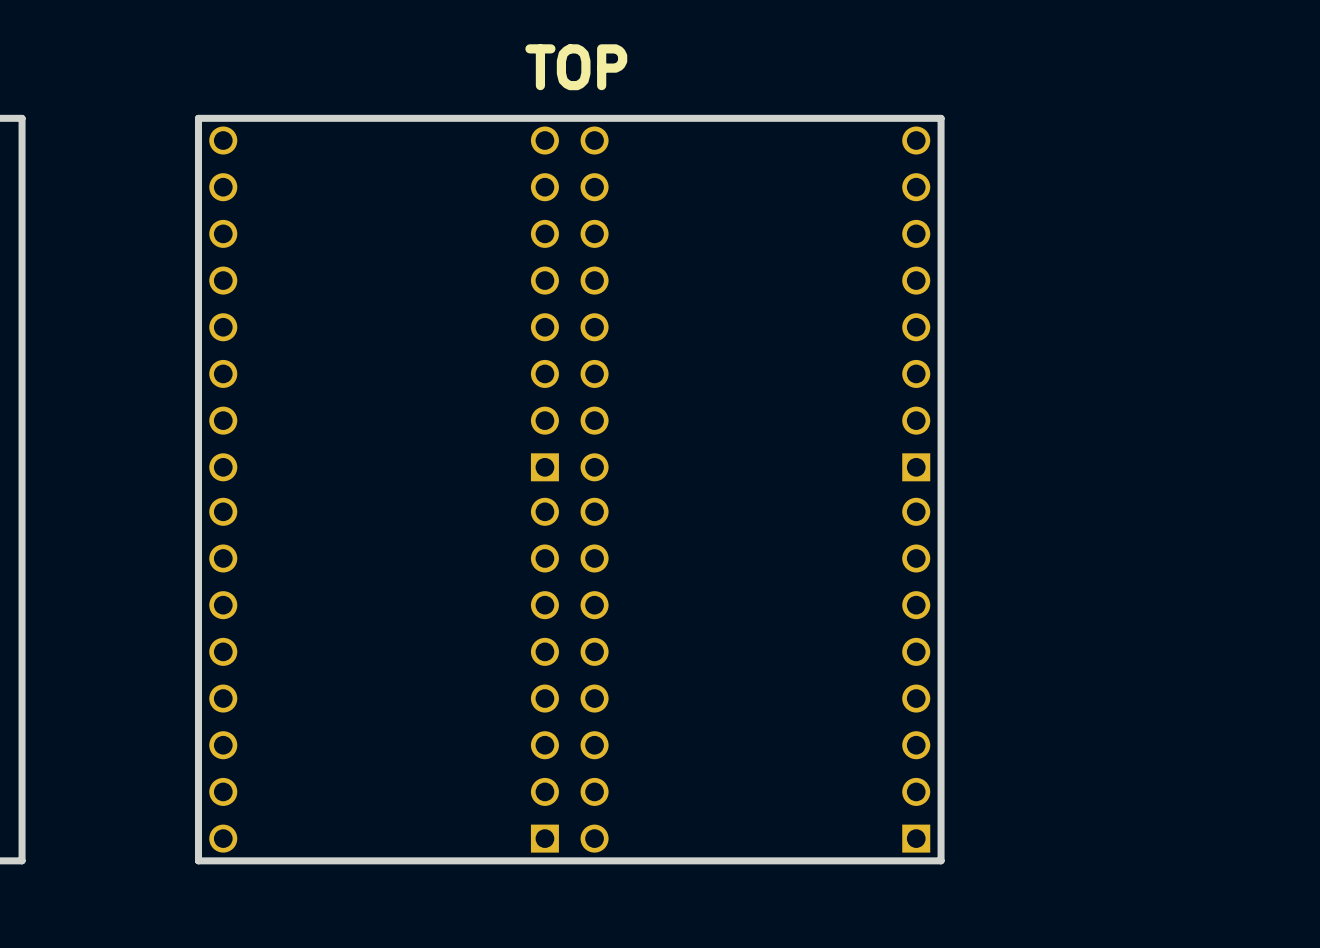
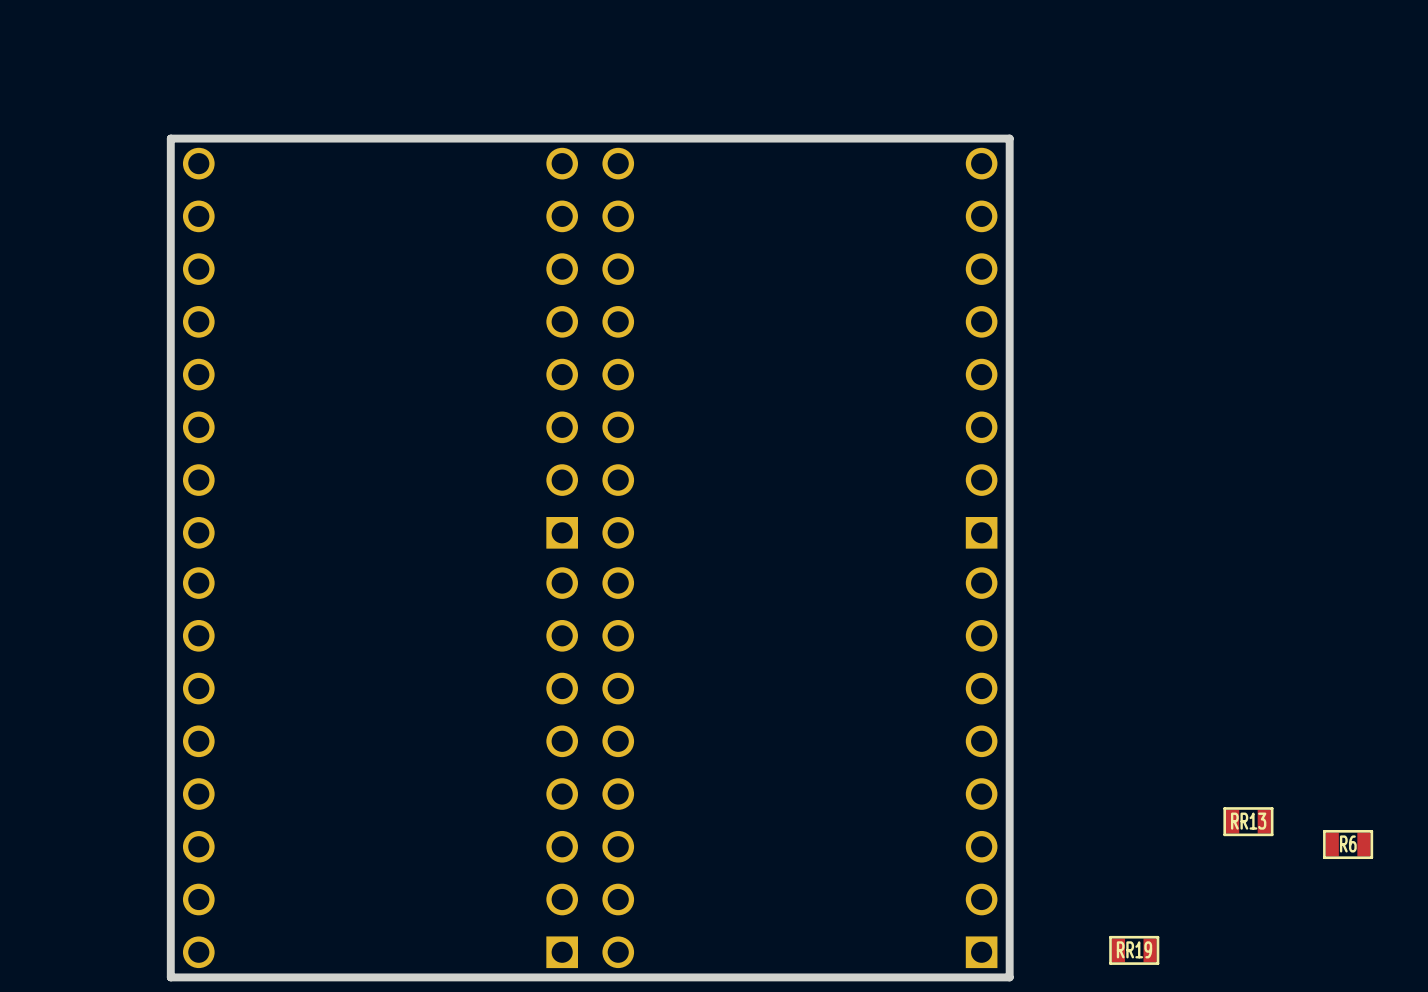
text: TOP (576, 67) -> none
RR13: none -> (1248, 821)
R6: none -> (1348, 844)
RR19: none -> (1134, 950)

